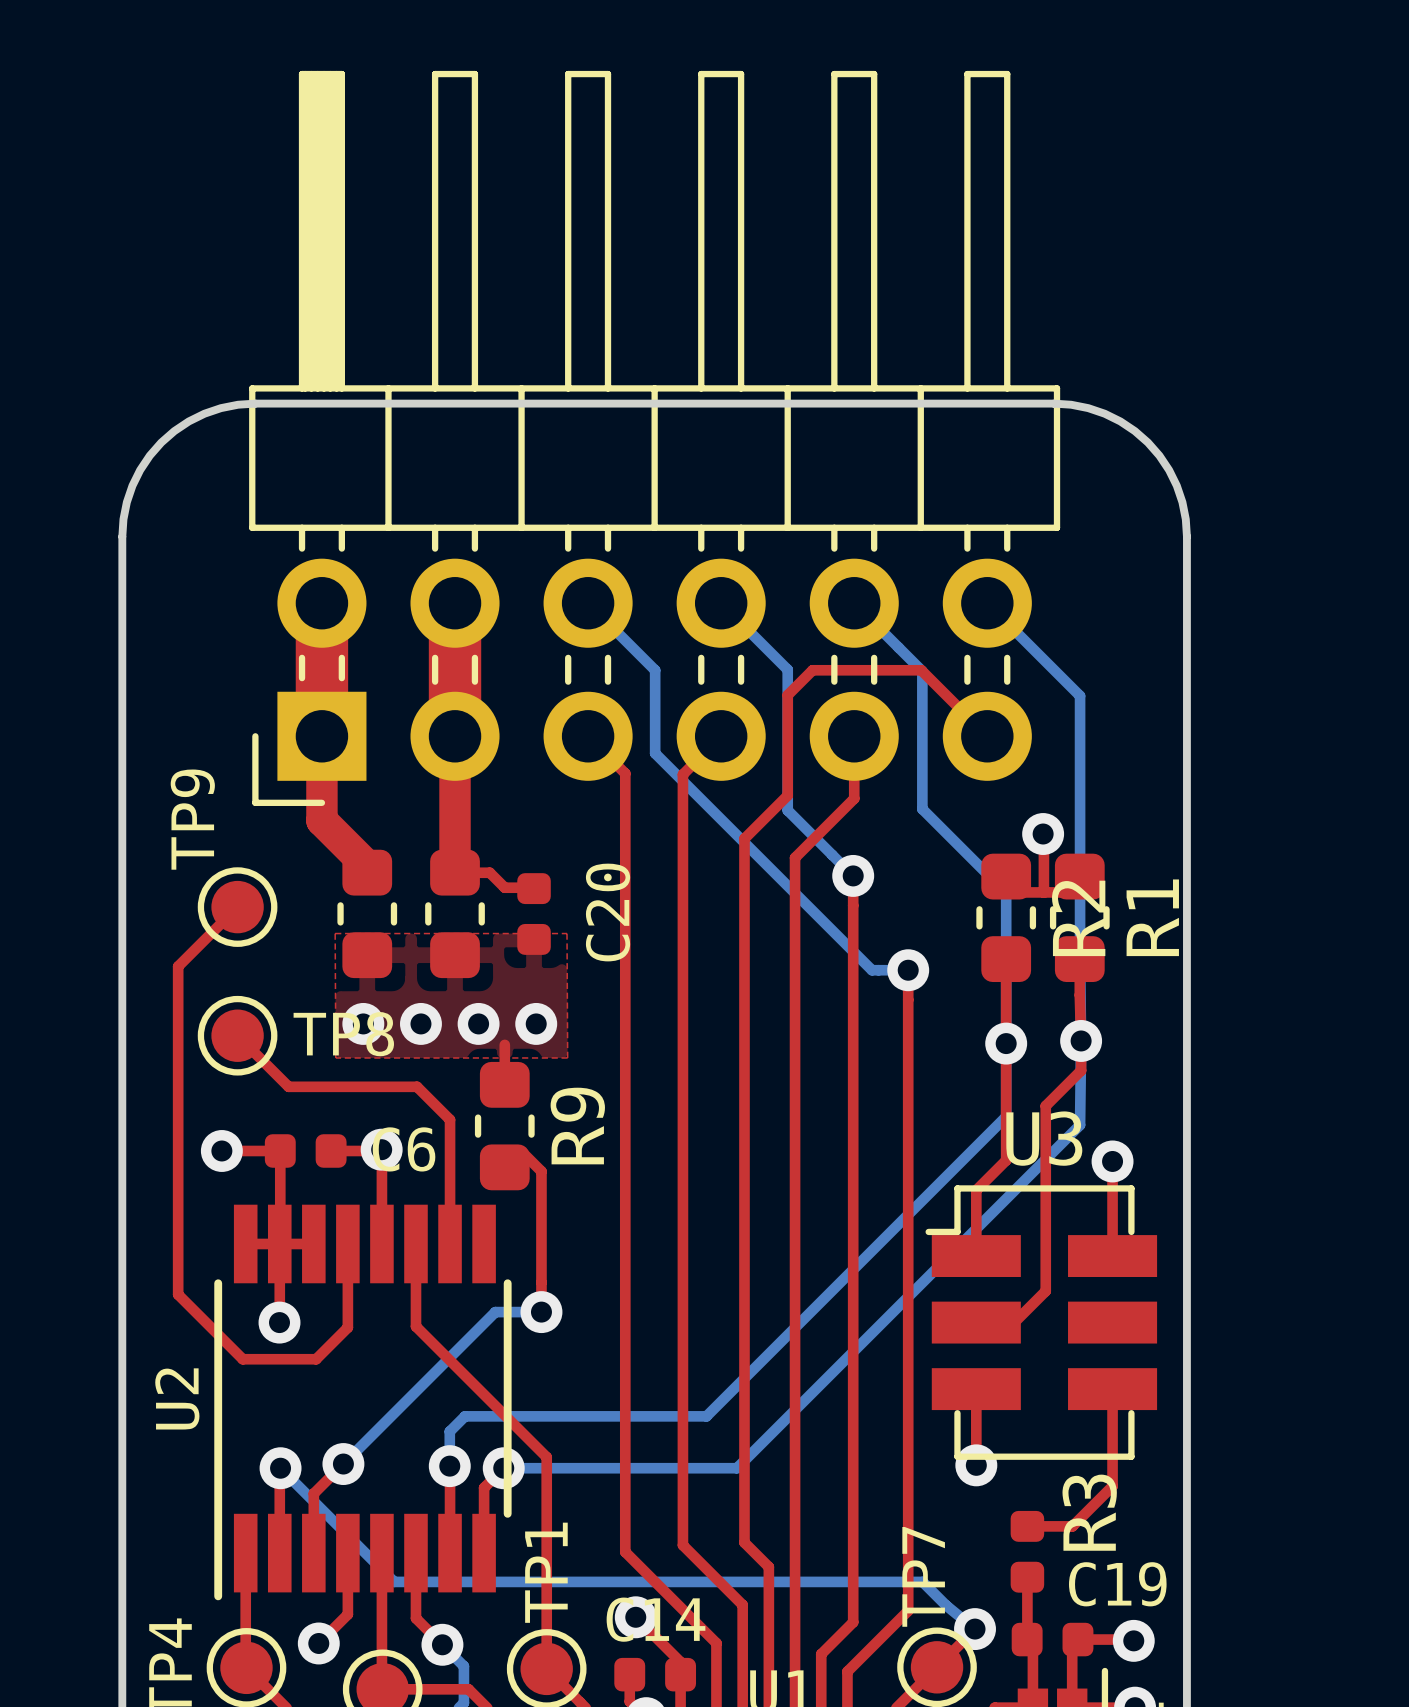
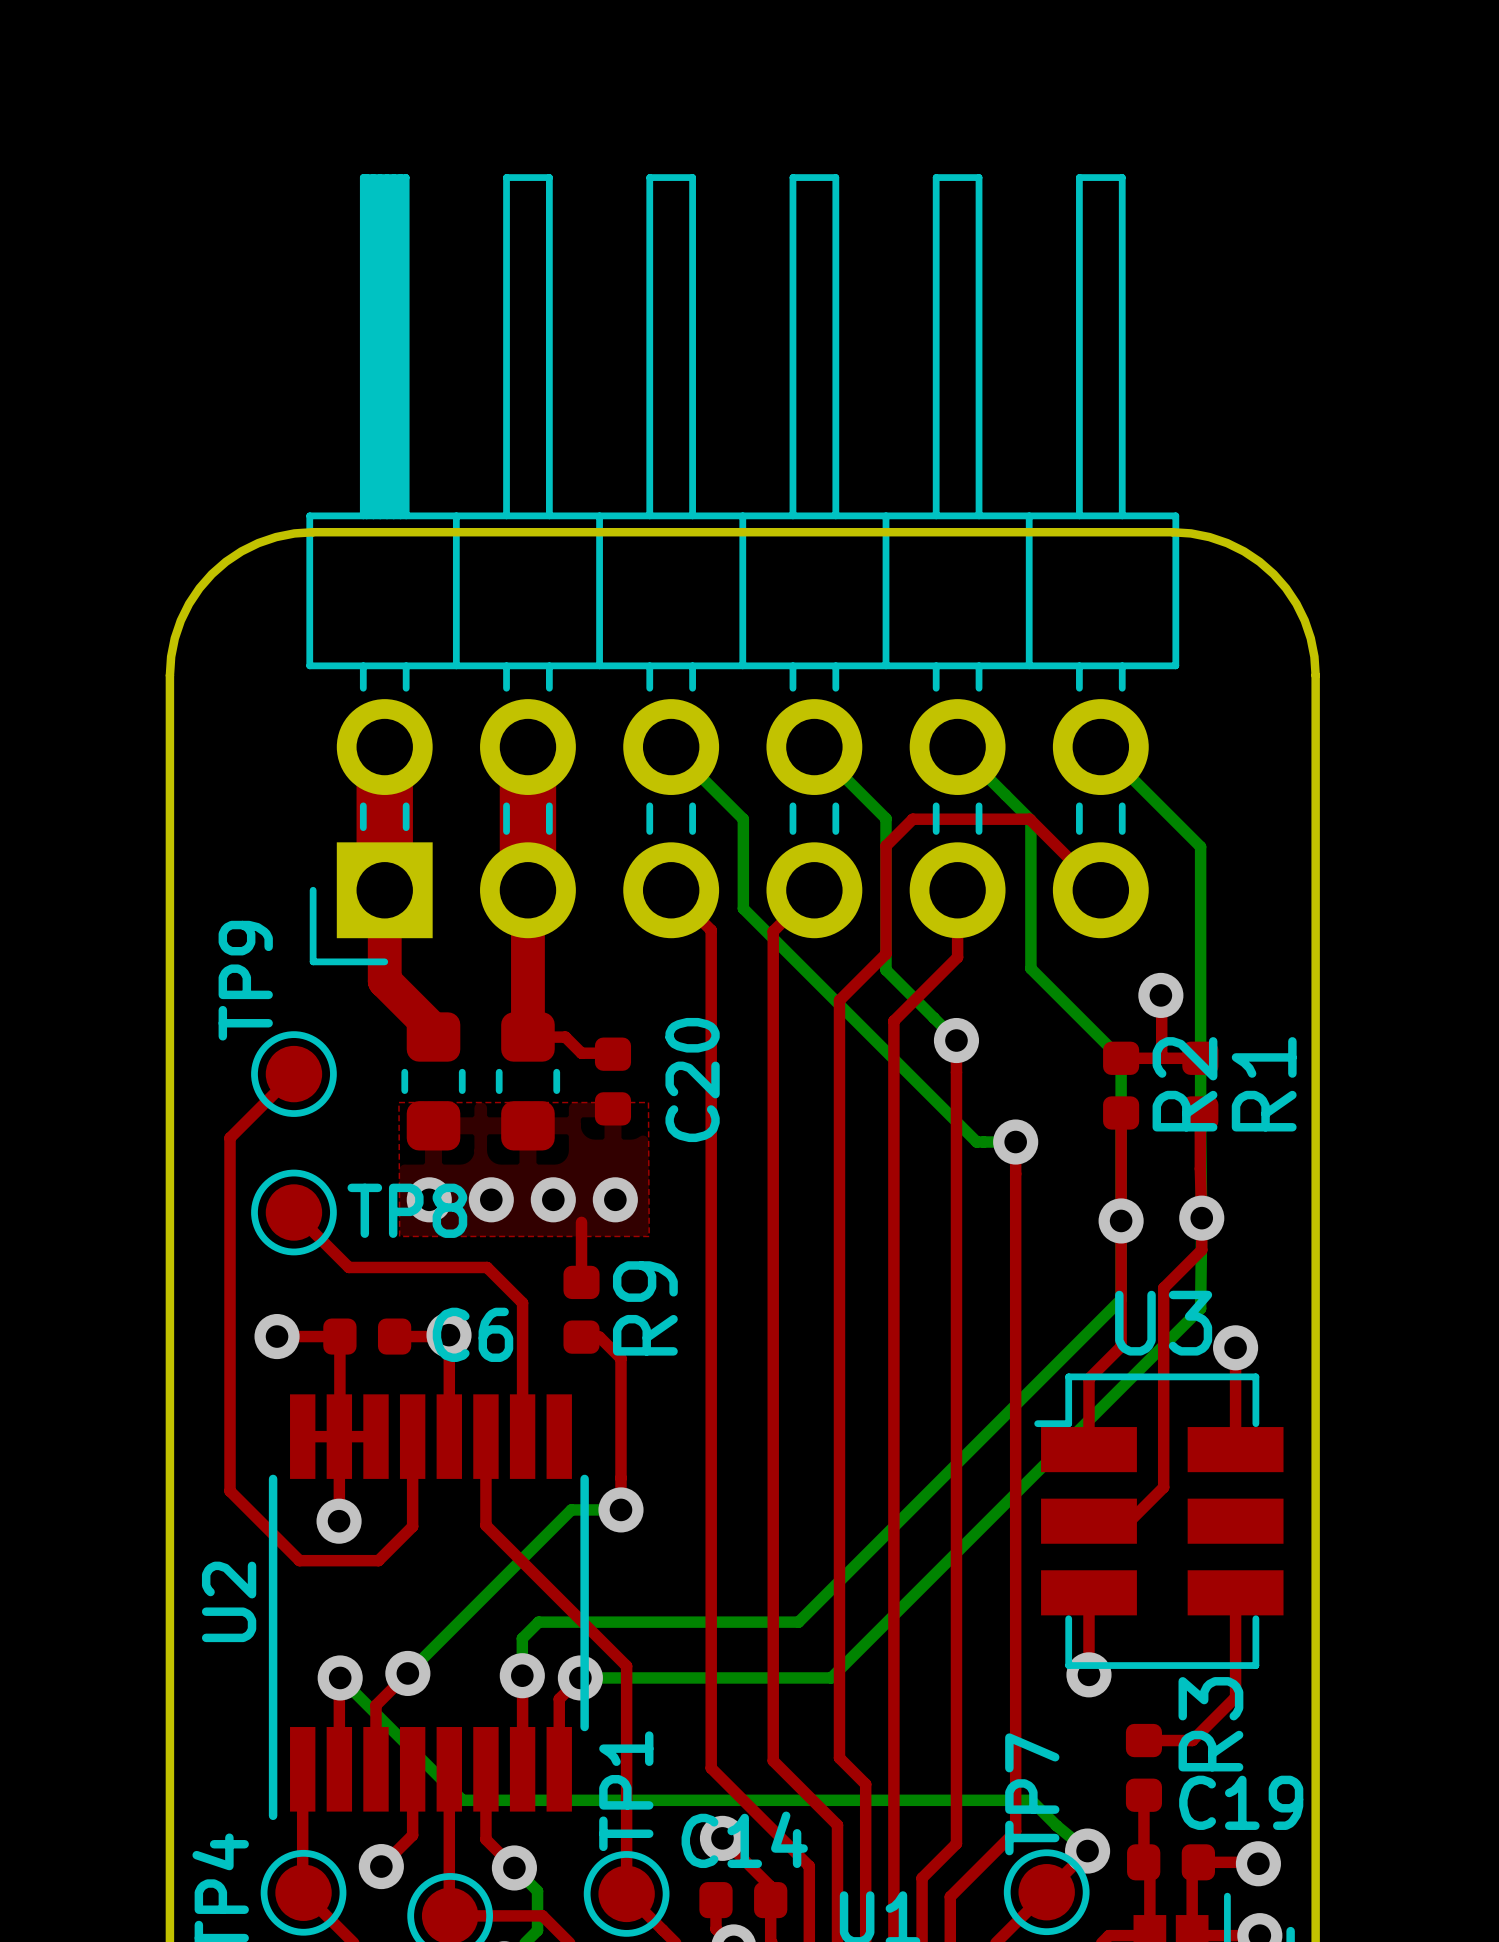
R2 footprint: [976, 853, 1037, 983] -> [1103, 1041, 1140, 1130]
R1 footprint: [1049, 853, 1110, 983] -> [1182, 1041, 1219, 1130]
R9 footprint: [474, 1061, 535, 1191] -> [563, 1265, 600, 1354]

